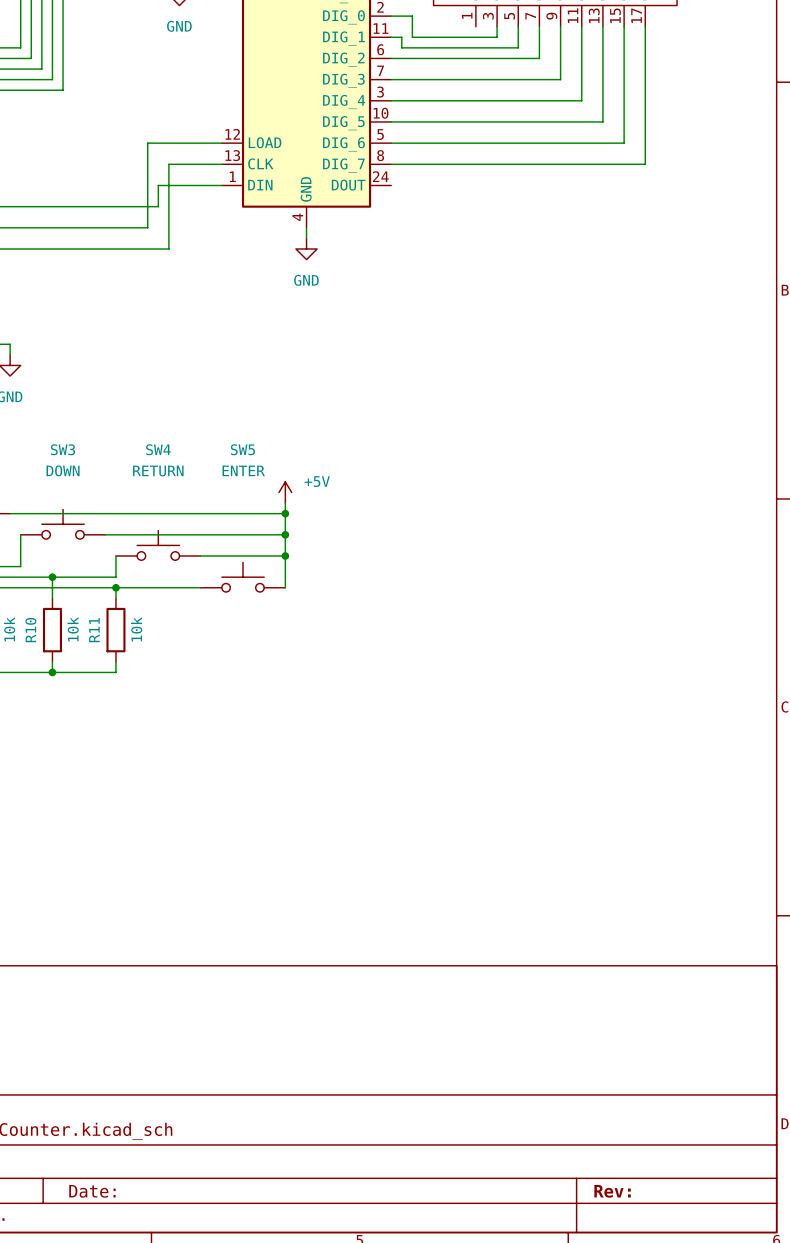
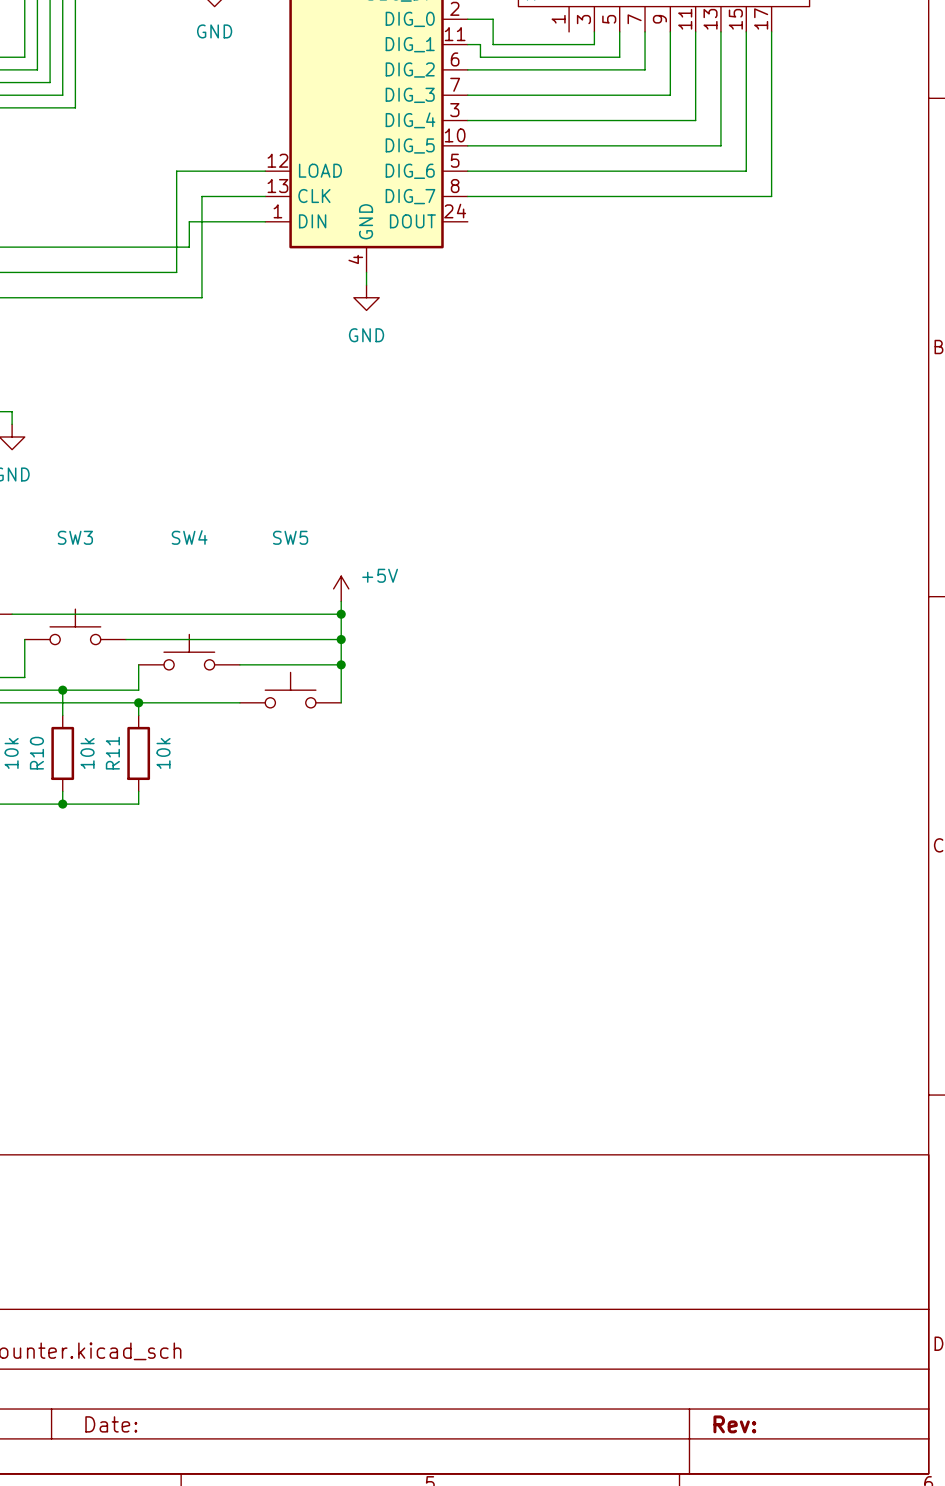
SW3 value: DOWN (63, 470) -> none
SW5 value: ENTER (243, 470) -> none
SW4 value: RETURN (158, 471) -> none

